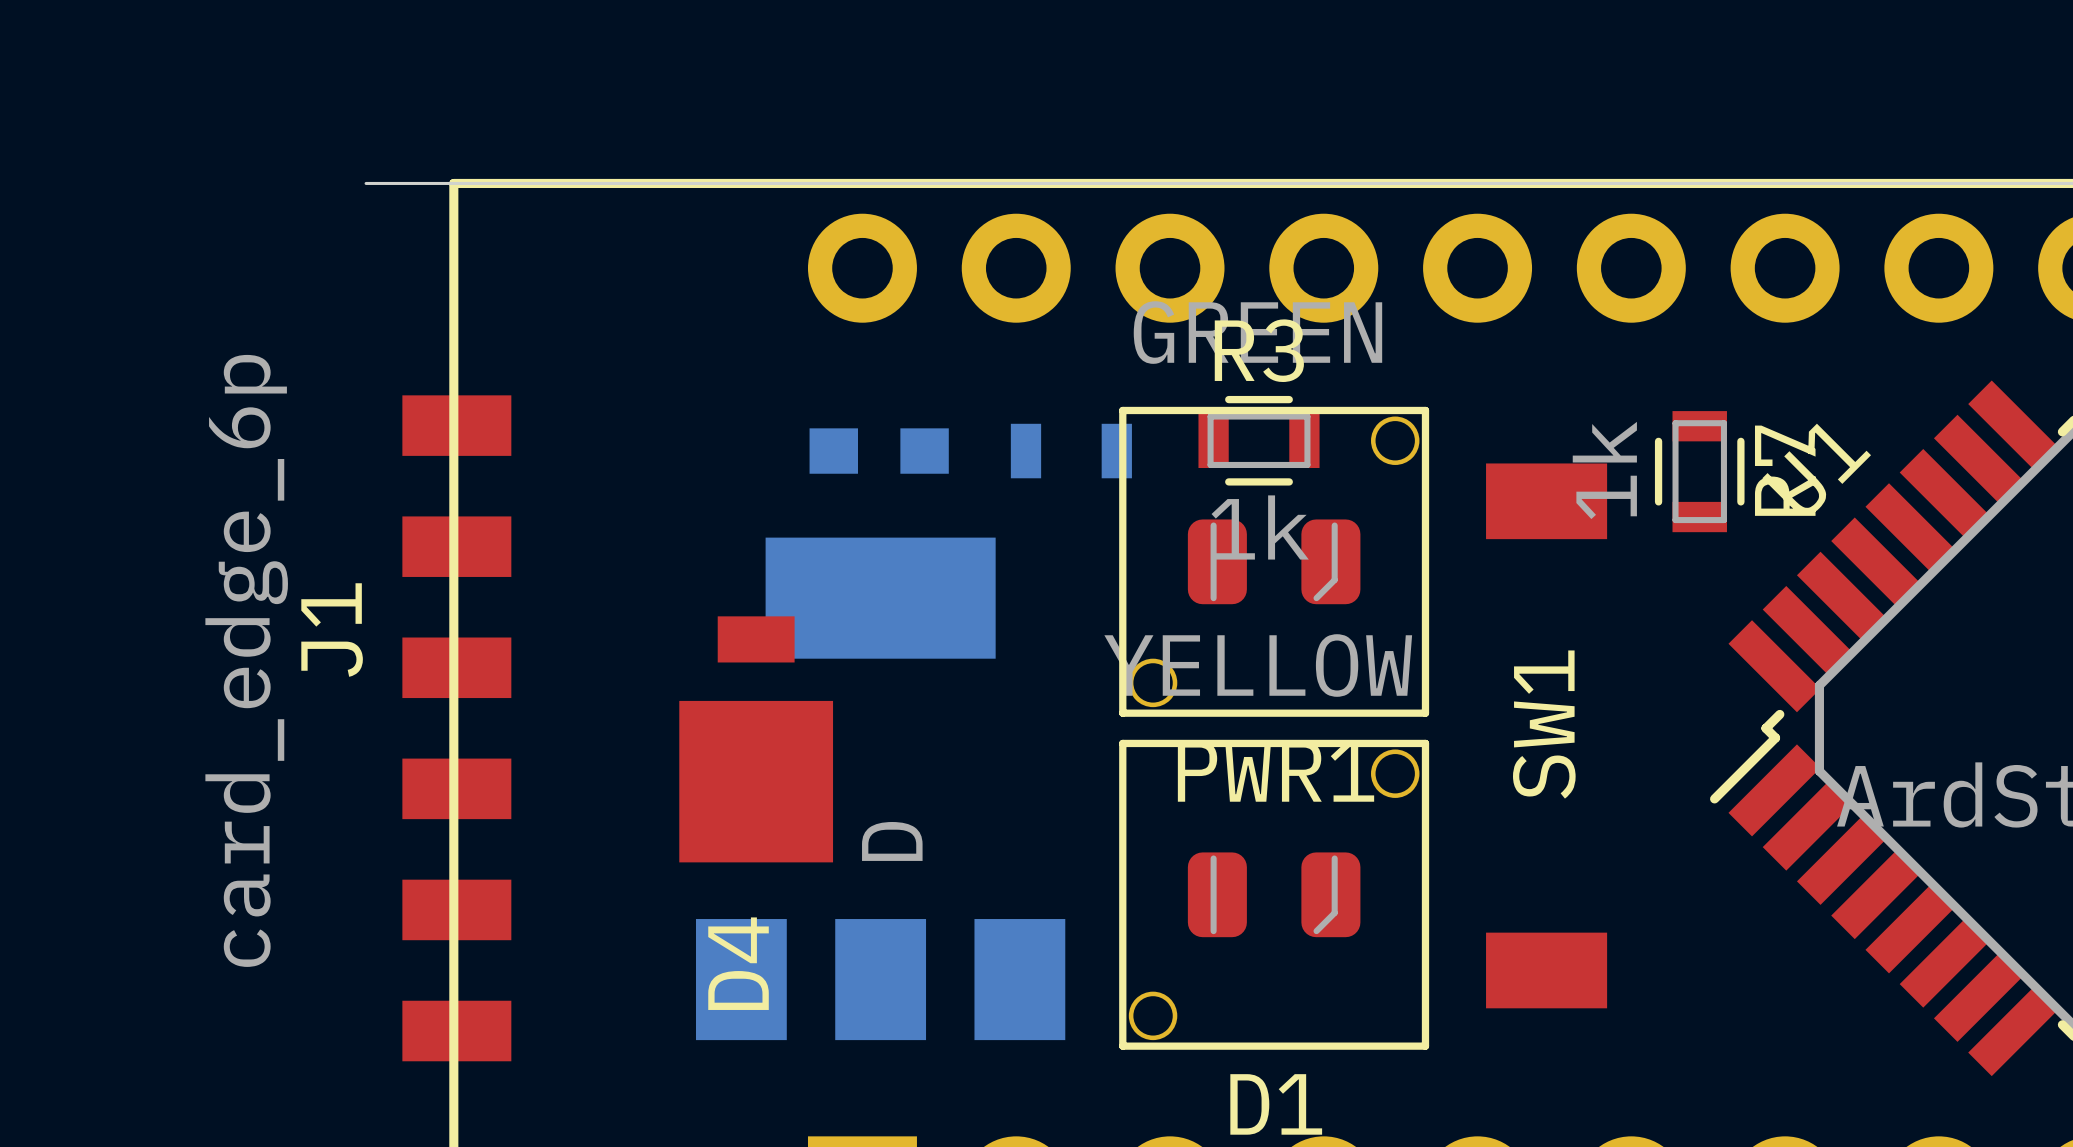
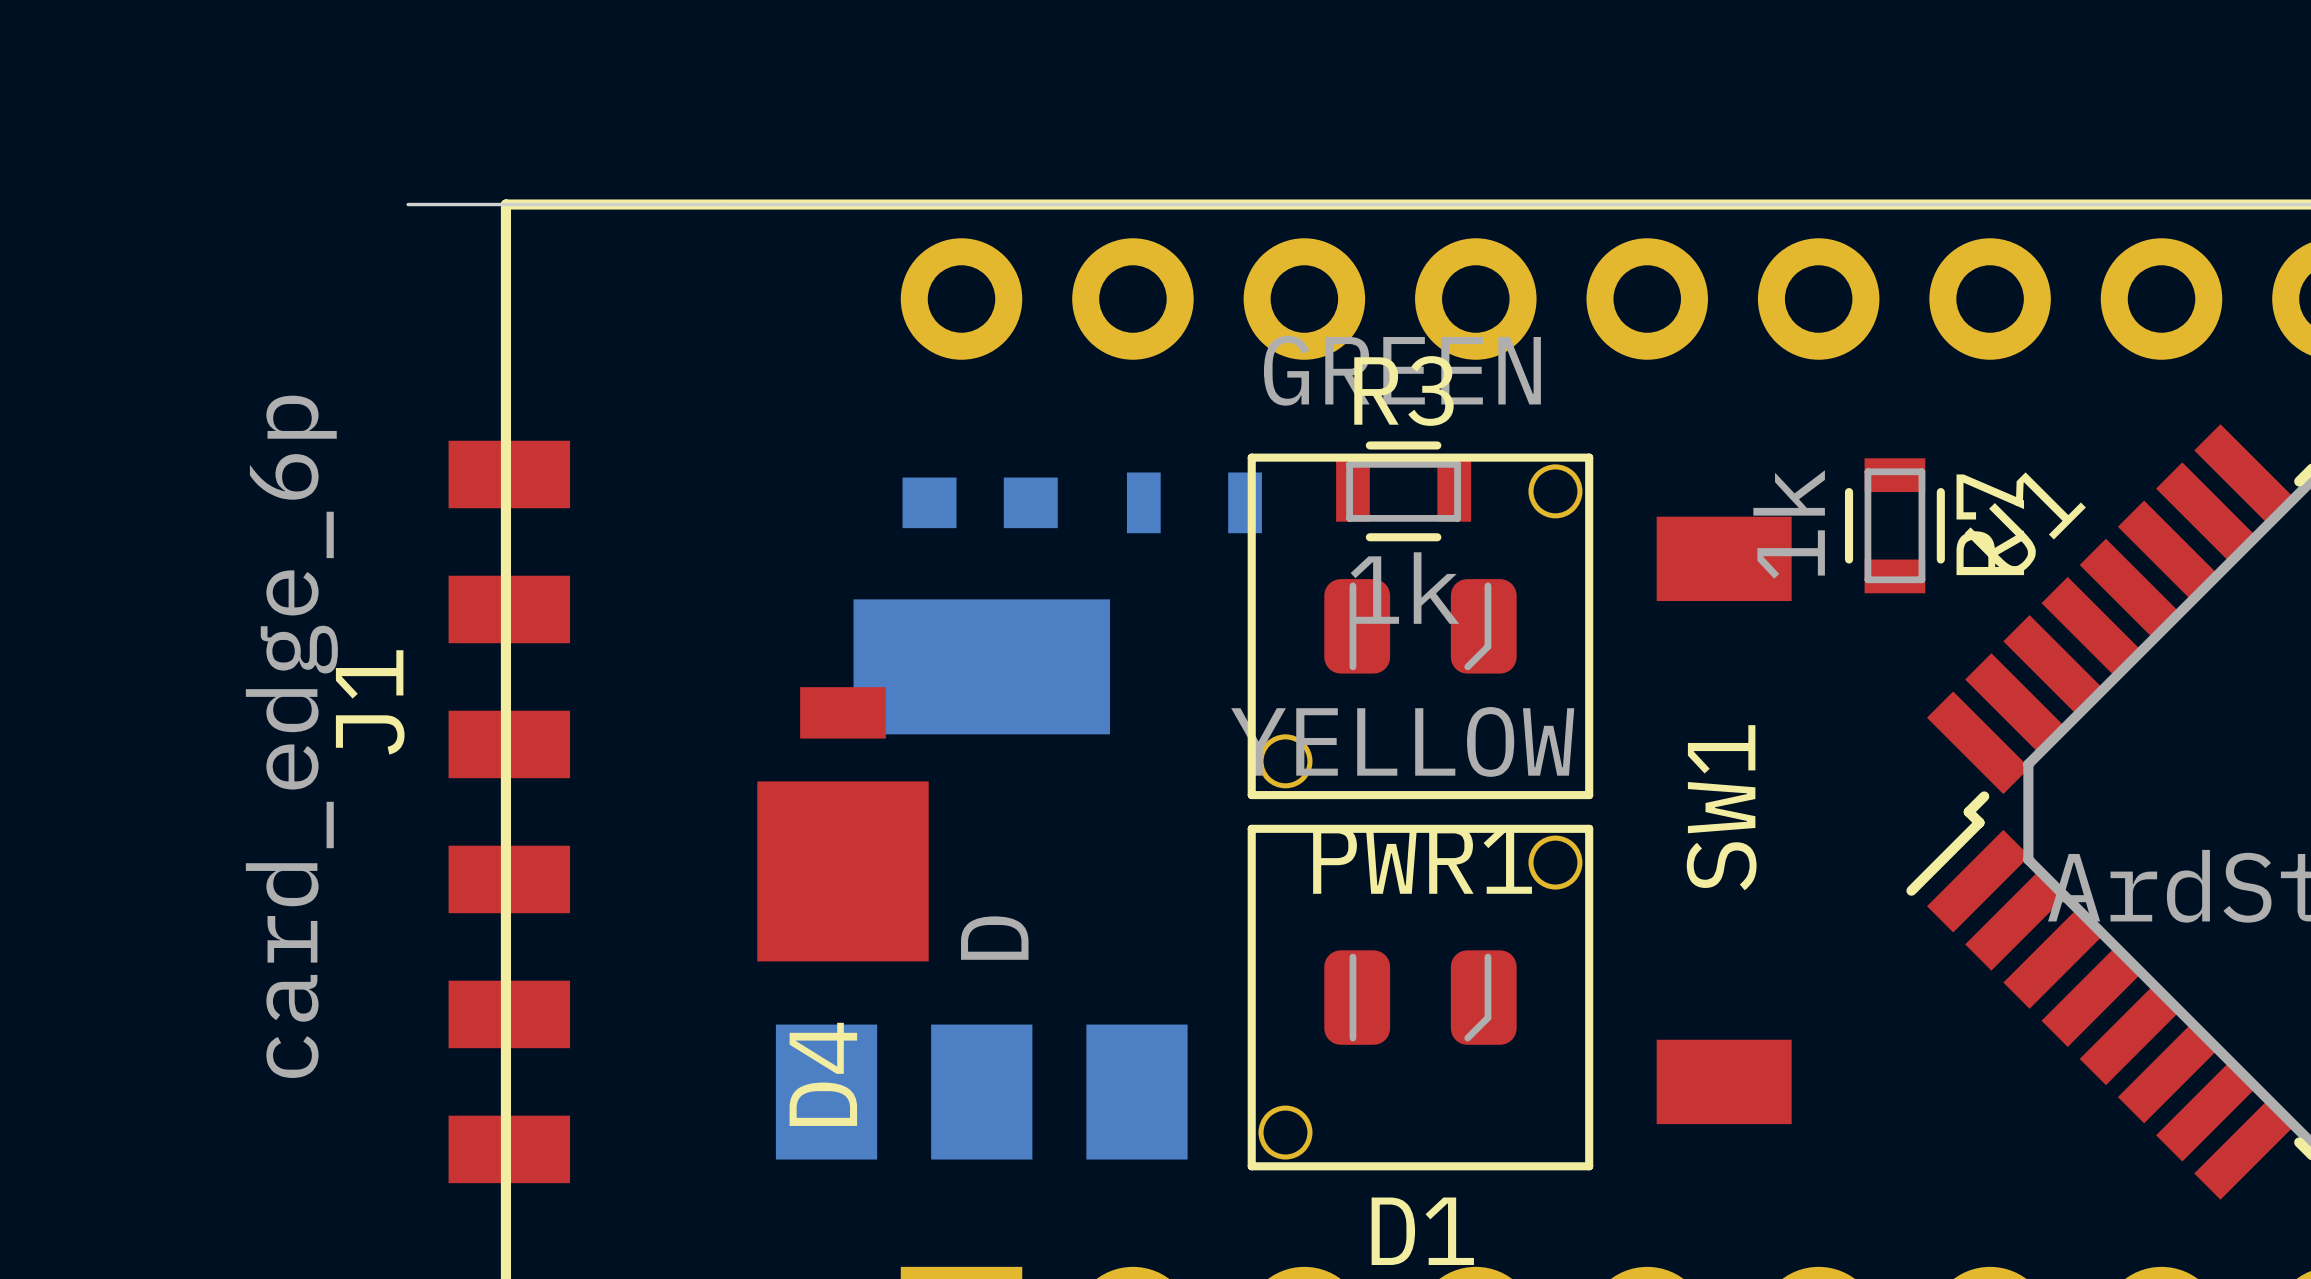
J1 value position: card_edge_6p (246, 660) -> card_edge_6p (291, 736)

